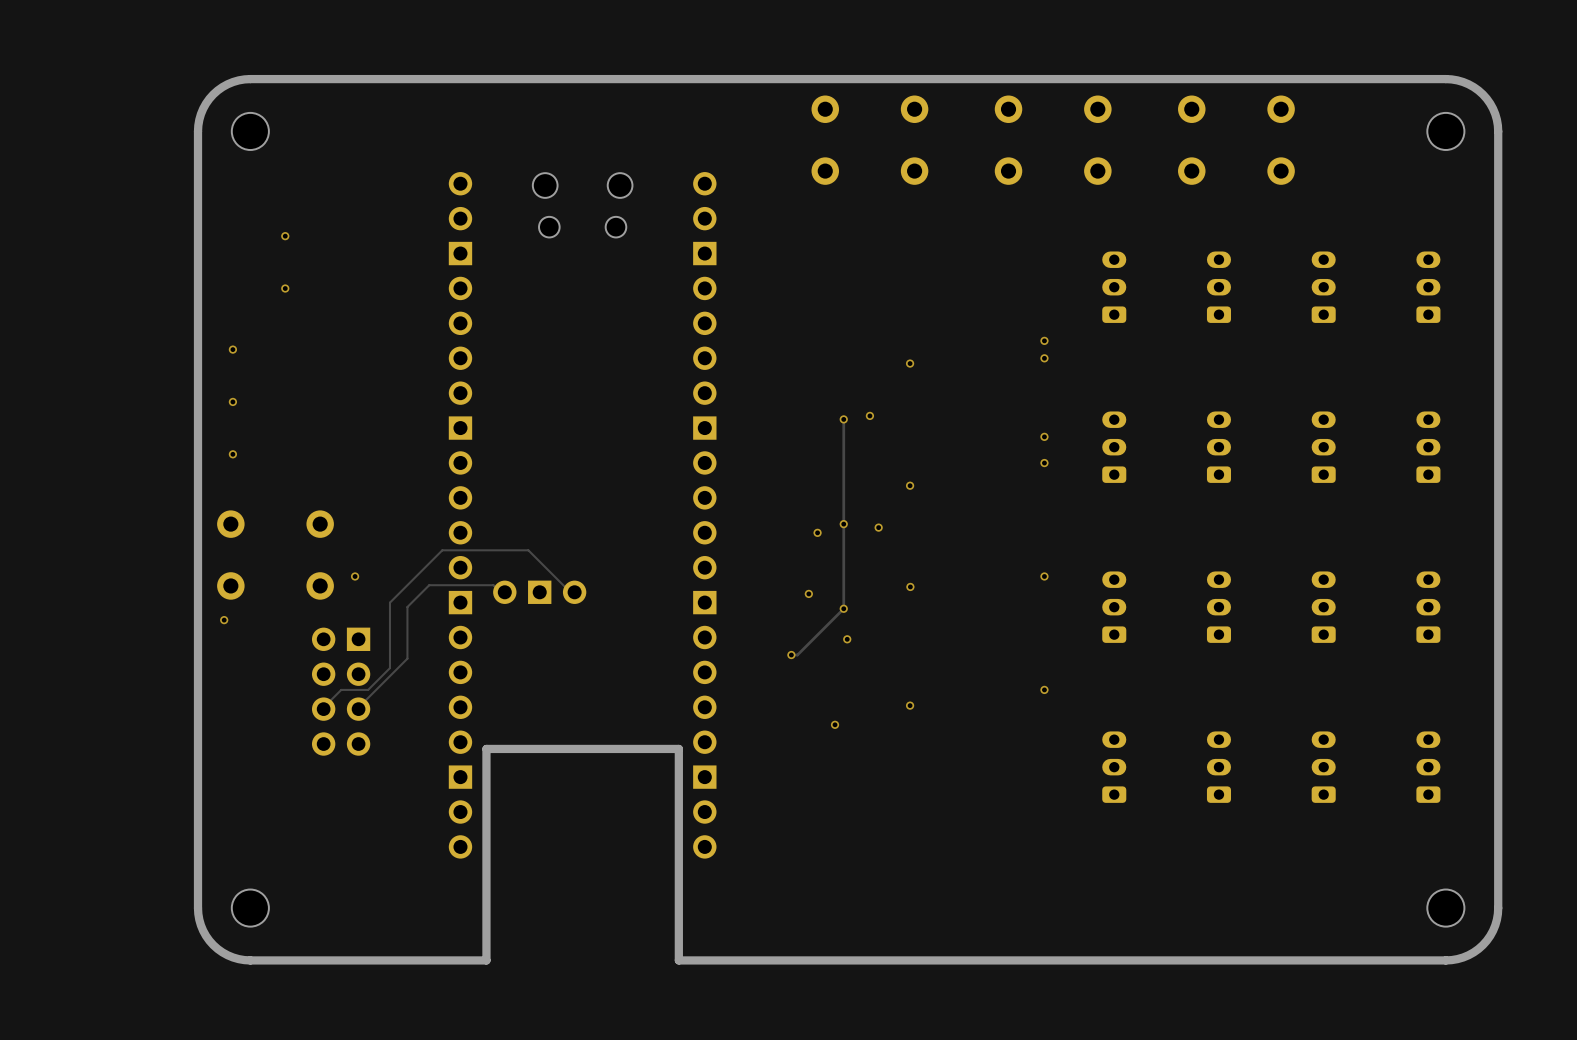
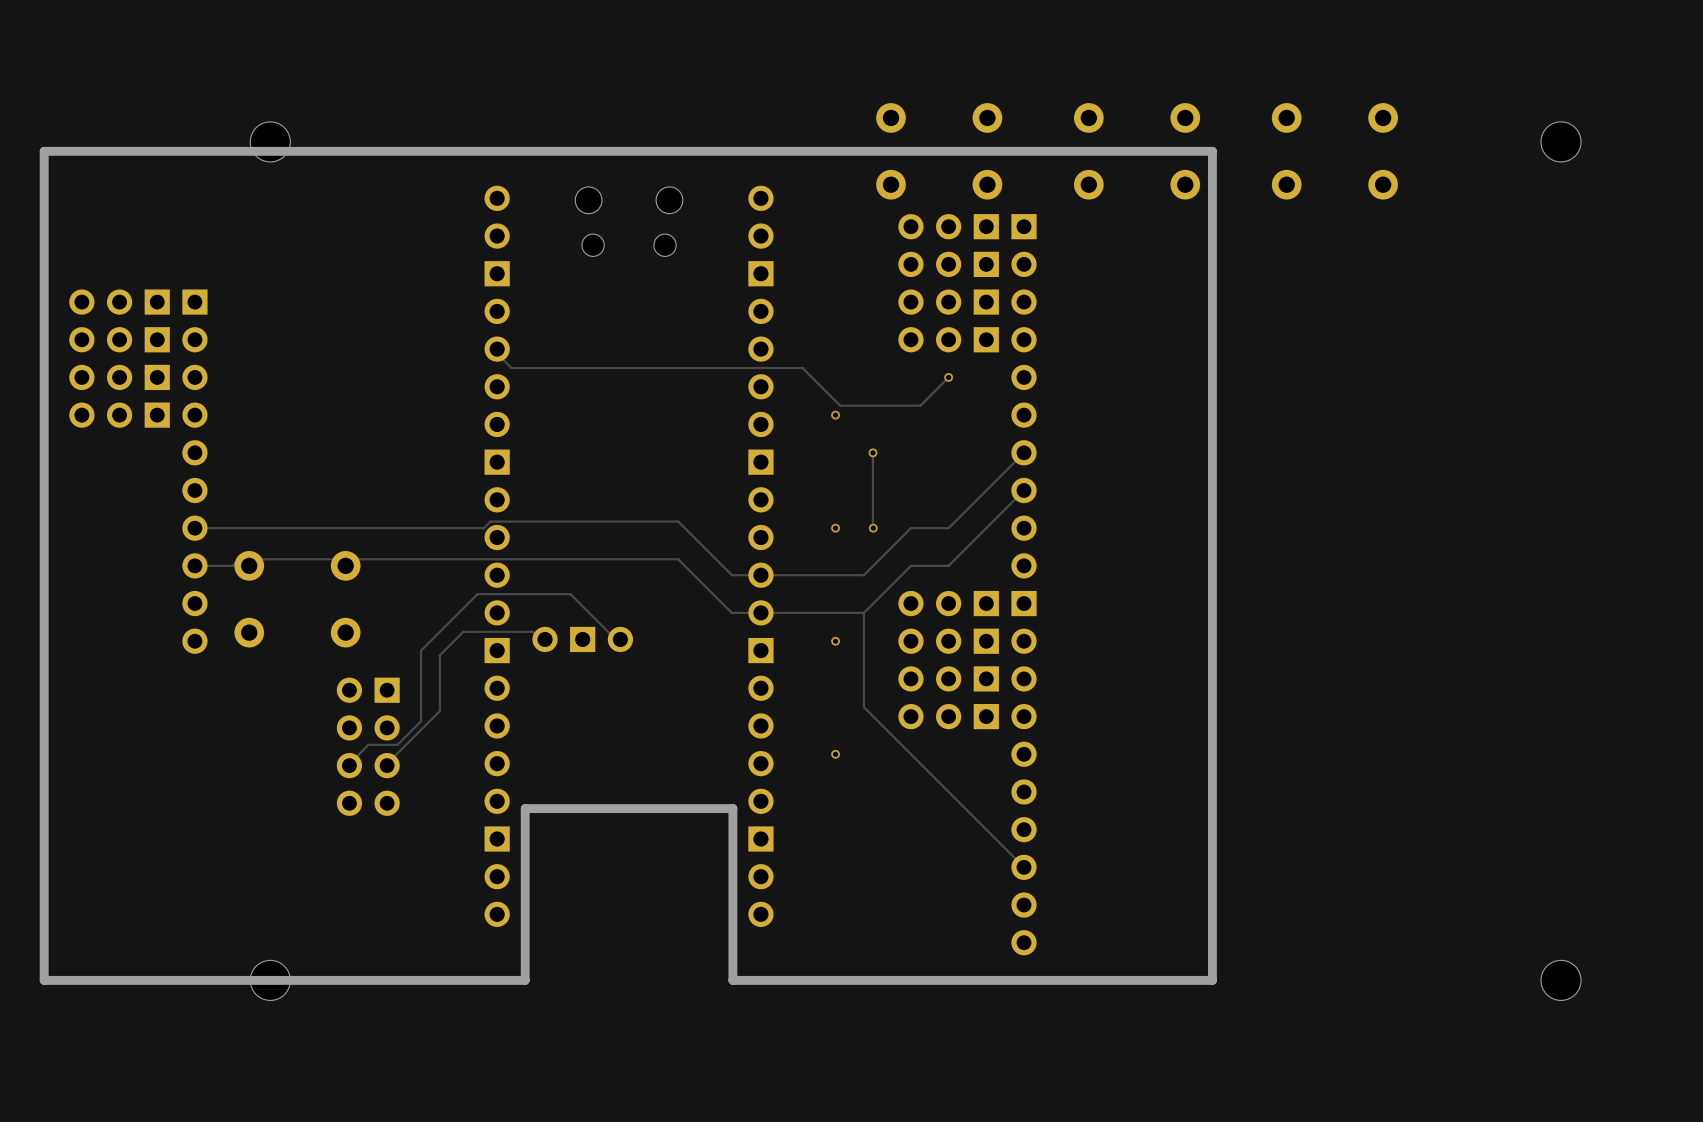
part: none -> (948, 226)
via: (285, 236) -> none
part: none -> (948, 264)
part: none -> (119, 302)
part: none -> (948, 302)
part: (1114, 287) -> none
part: (1218, 287) -> none
part: (1323, 287) -> none
part: (1428, 287) -> none
via: (285, 288) -> none
part: none -> (119, 339)
part: none -> (948, 339)
track: none -> (492, 349) (511, 368) (802, 368) (840, 405) (920, 405) (948, 377)
via: (1044, 340) -> none
part: none -> (119, 377)
via: (232, 349) -> none
via: none -> (948, 377)
via: (1044, 358) -> none
via: (910, 363) -> none
part: none -> (1024, 396)
part: none -> (119, 415)
via: none -> (835, 415)
via: (232, 401) -> none
via: (869, 415) -> none
track: none -> (872, 452) (873, 528)
via: none -> (872, 452)
track: (843, 419) (843, 608) (797, 655) (791, 655) -> none
via: (843, 419) -> none
track: none -> (1024, 452) (948, 528) (910, 528) (863, 575) (731, 575) (678, 521) (490, 521) (483, 528) (194, 528)
part: none -> (194, 471)
via: (1044, 436) -> none
part: (1114, 447) -> none
part: (1218, 447) -> none
part: (1323, 447) -> none
part: (1428, 447) -> none
via: (232, 454) -> none
track: none -> (1024, 490) (948, 565) (910, 565) (863, 612)
via: (1044, 463) -> none
via: (910, 485) -> none
via: none -> (835, 528)
via: none -> (873, 528)
track: none -> (194, 565) (232, 565) (239, 559) (678, 559) (731, 612) (863, 612)
via: (843, 524) -> none
via: (878, 527) -> none
via: (817, 532) -> none
part: none -> (948, 603)
track: none -> (863, 612) (863, 707) (1024, 867)
via: (355, 576) -> none
via: (1044, 576) -> none
via: (910, 586) -> none
via: none -> (835, 641)
via: (808, 593) -> none
part: none -> (948, 641)
part: (1114, 607) -> none
part: (1218, 607) -> none
part: (1323, 607) -> none
part: (1428, 607) -> none
via: (843, 608) -> none
via: (224, 620) -> none
part: none -> (948, 678)
via: (847, 639) -> none
via: (791, 655) -> none
part: none -> (948, 716)
via: (1044, 689) -> none
via: none -> (835, 754)
via: (910, 705) -> none
part: none -> (1024, 773)
via: (835, 724) -> none
part: (1114, 767) -> none
part: (1218, 767) -> none
part: (1323, 767) -> none
part: (1428, 767) -> none
board edge: (678, 908) (678, 960) (1445, 960) (1463, 957) (1482, 945) (1493, 930) (1498, 908) (1498, 131) (1495, 114) (1482, 94) (1468, 84) (1445, 79) (250, 79) (233, 82) (217, 90) (203, 108) (198, 131) (198, 908) (200, 925) (209, 940) (217, 949) (227, 955) (244, 960) (486, 960) (486, 908) -> (732, 980) (1212, 980) (1212, 151) (44, 151) (44, 980) (525, 980)

